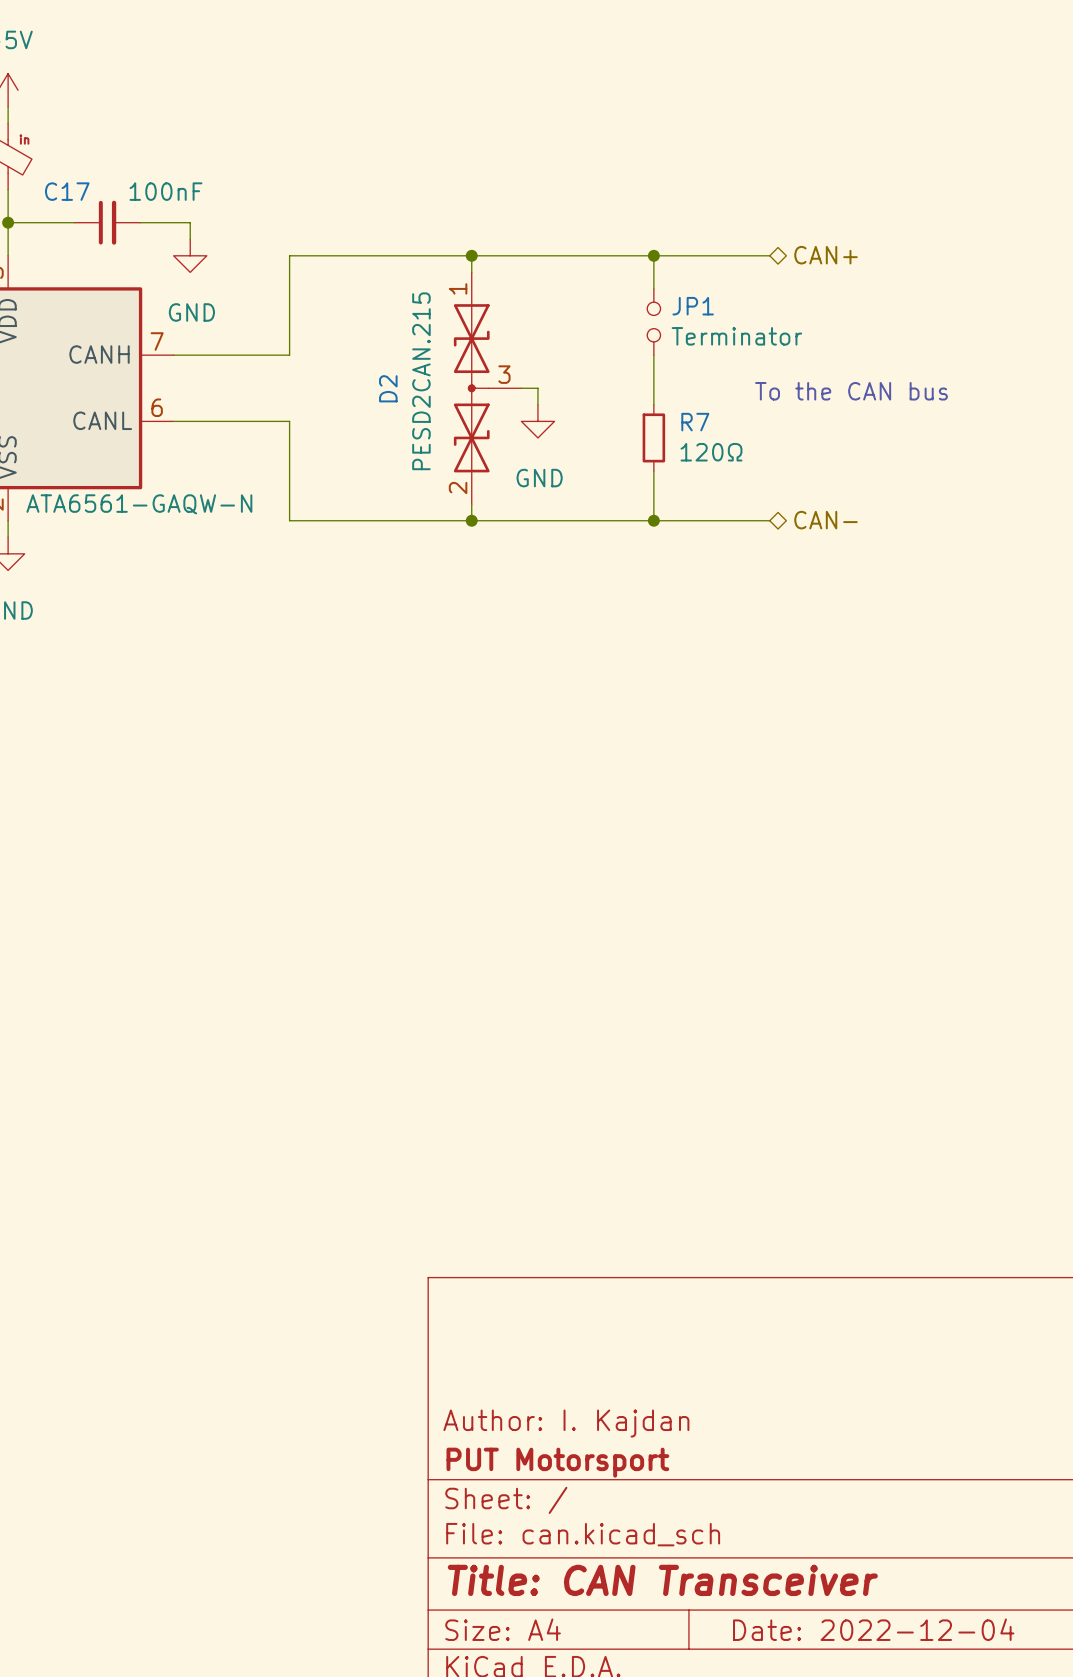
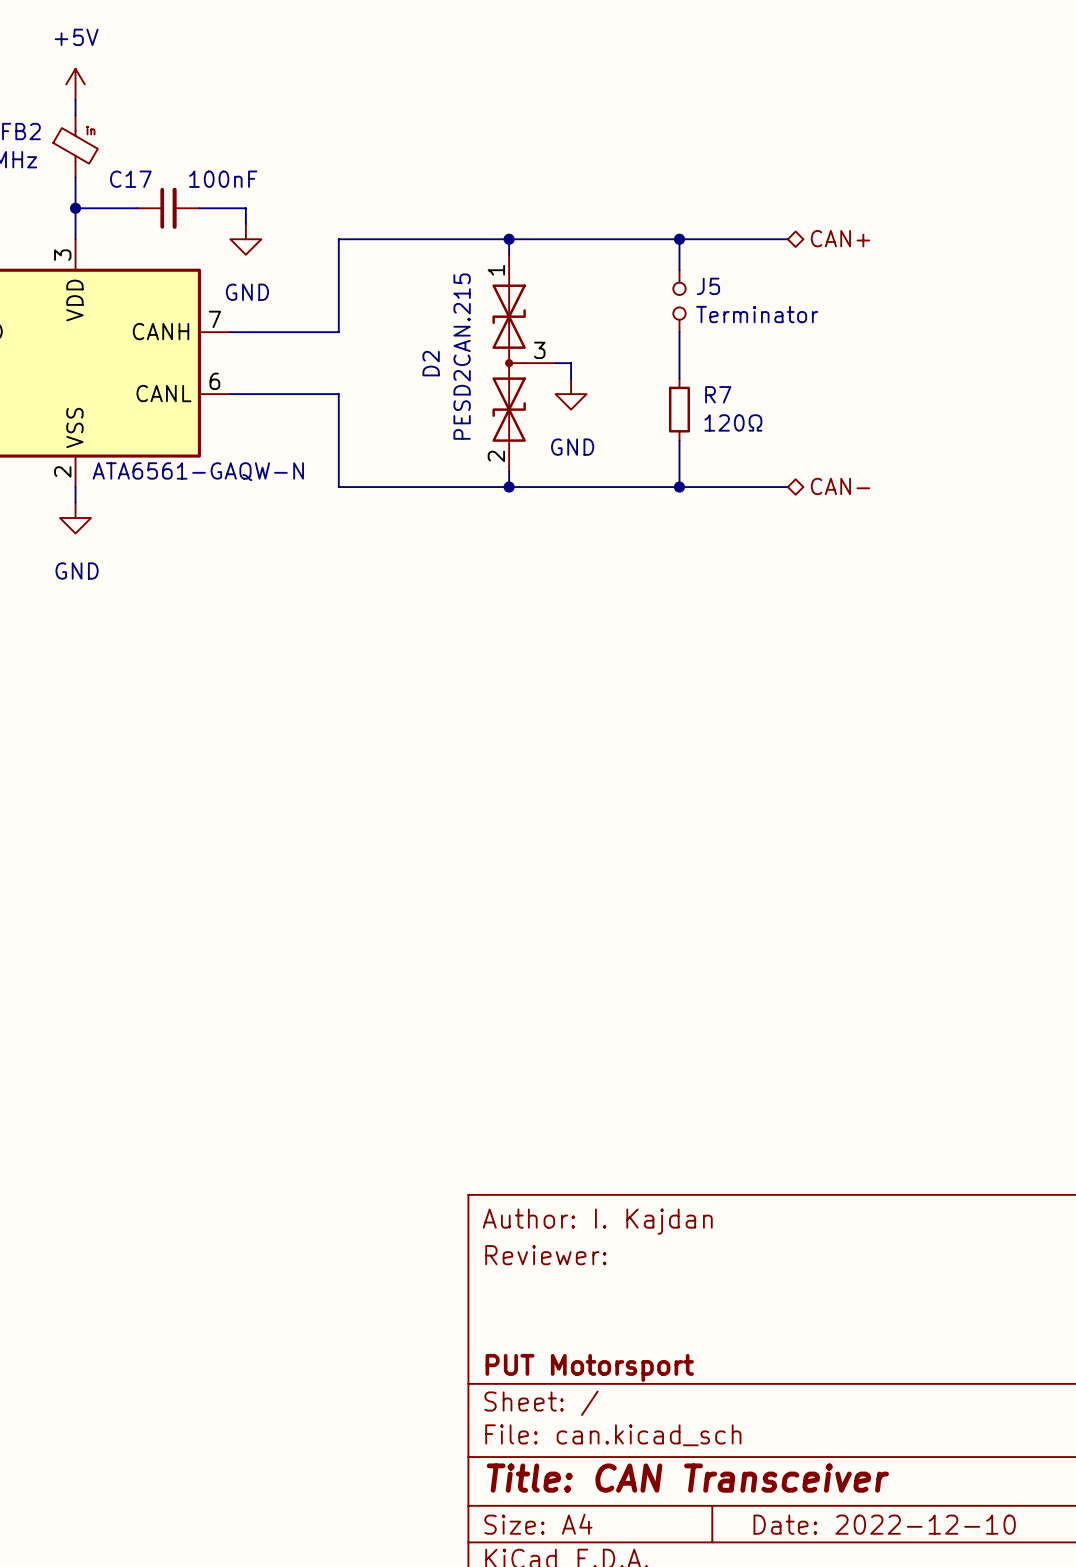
JP1 name: JP1 (693, 306) -> J5 (708, 286)
text: To the CAN bus (851, 391) -> none
title block: none -> Reviewer: (545, 1255)
title block position: Author: I. Kajdan (566, 1423) -> Author: I. Kajdan (597, 1221)
title block: Date: 2022-12-04 (873, 1629) -> Date: 2022-12-10 (884, 1524)

